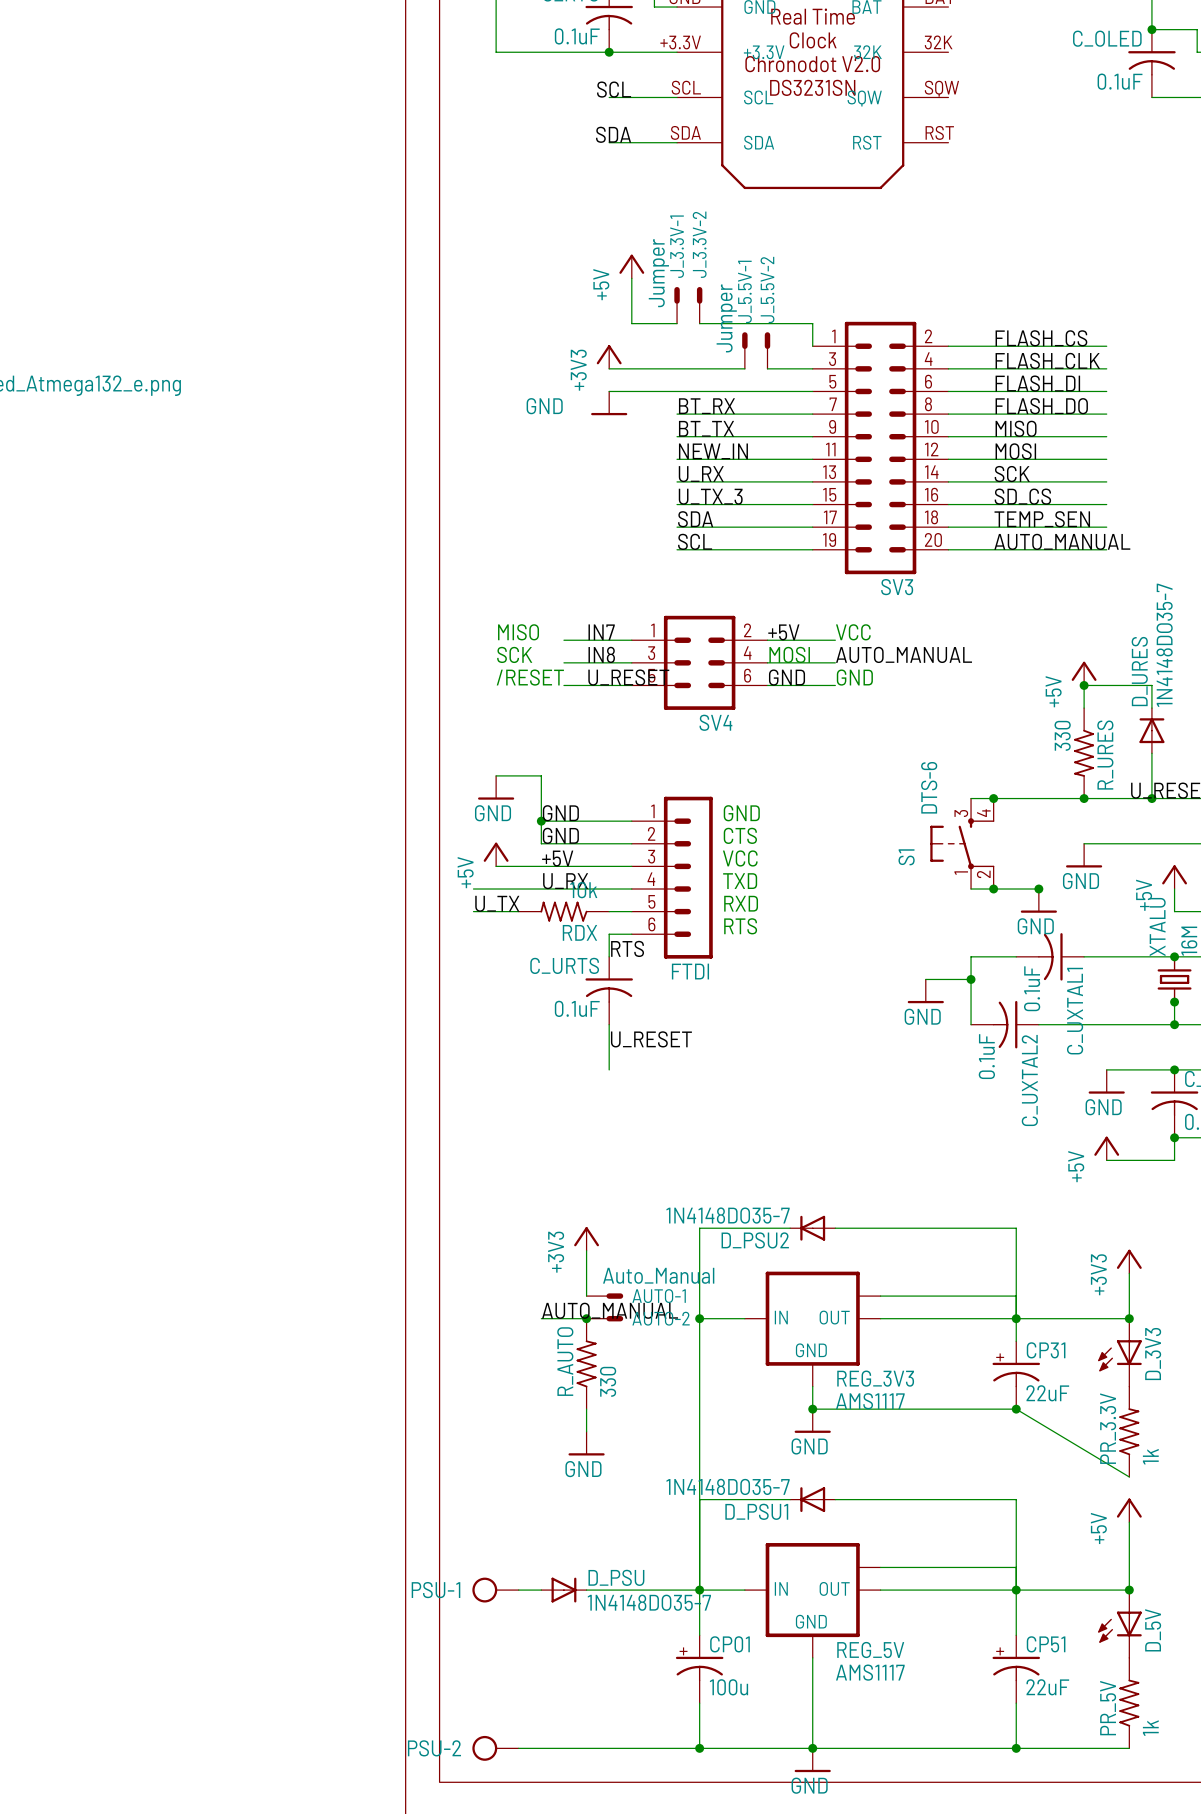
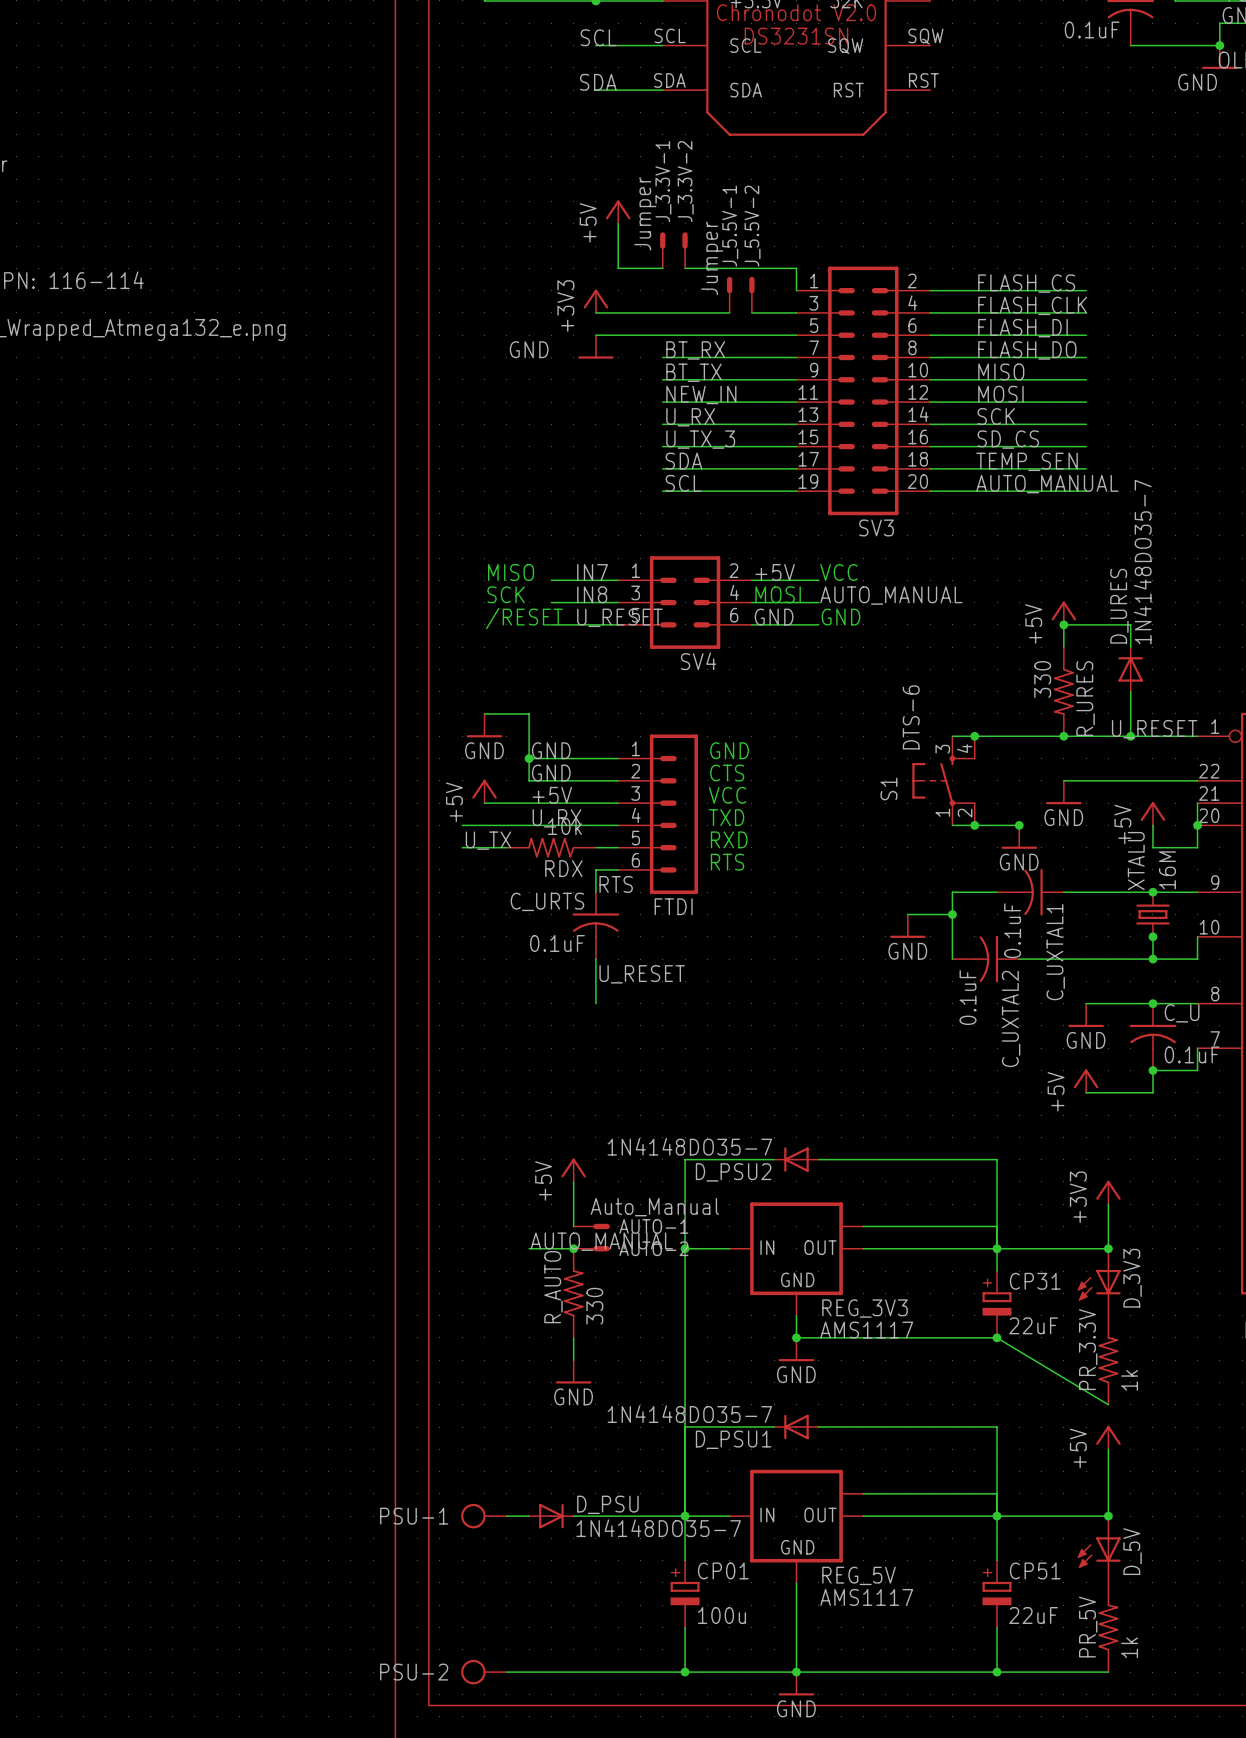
power symbol: +3V3 (586, 1238) -> +5V (573, 1170)
CP31 symbol: [992, 1341, 1041, 1410] -> [982, 1271, 1012, 1338]
CP01 symbol: [675, 1635, 724, 1704] -> [670, 1560, 700, 1628]
CP51 symbol: [992, 1635, 1041, 1704] -> [982, 1560, 1012, 1628]

